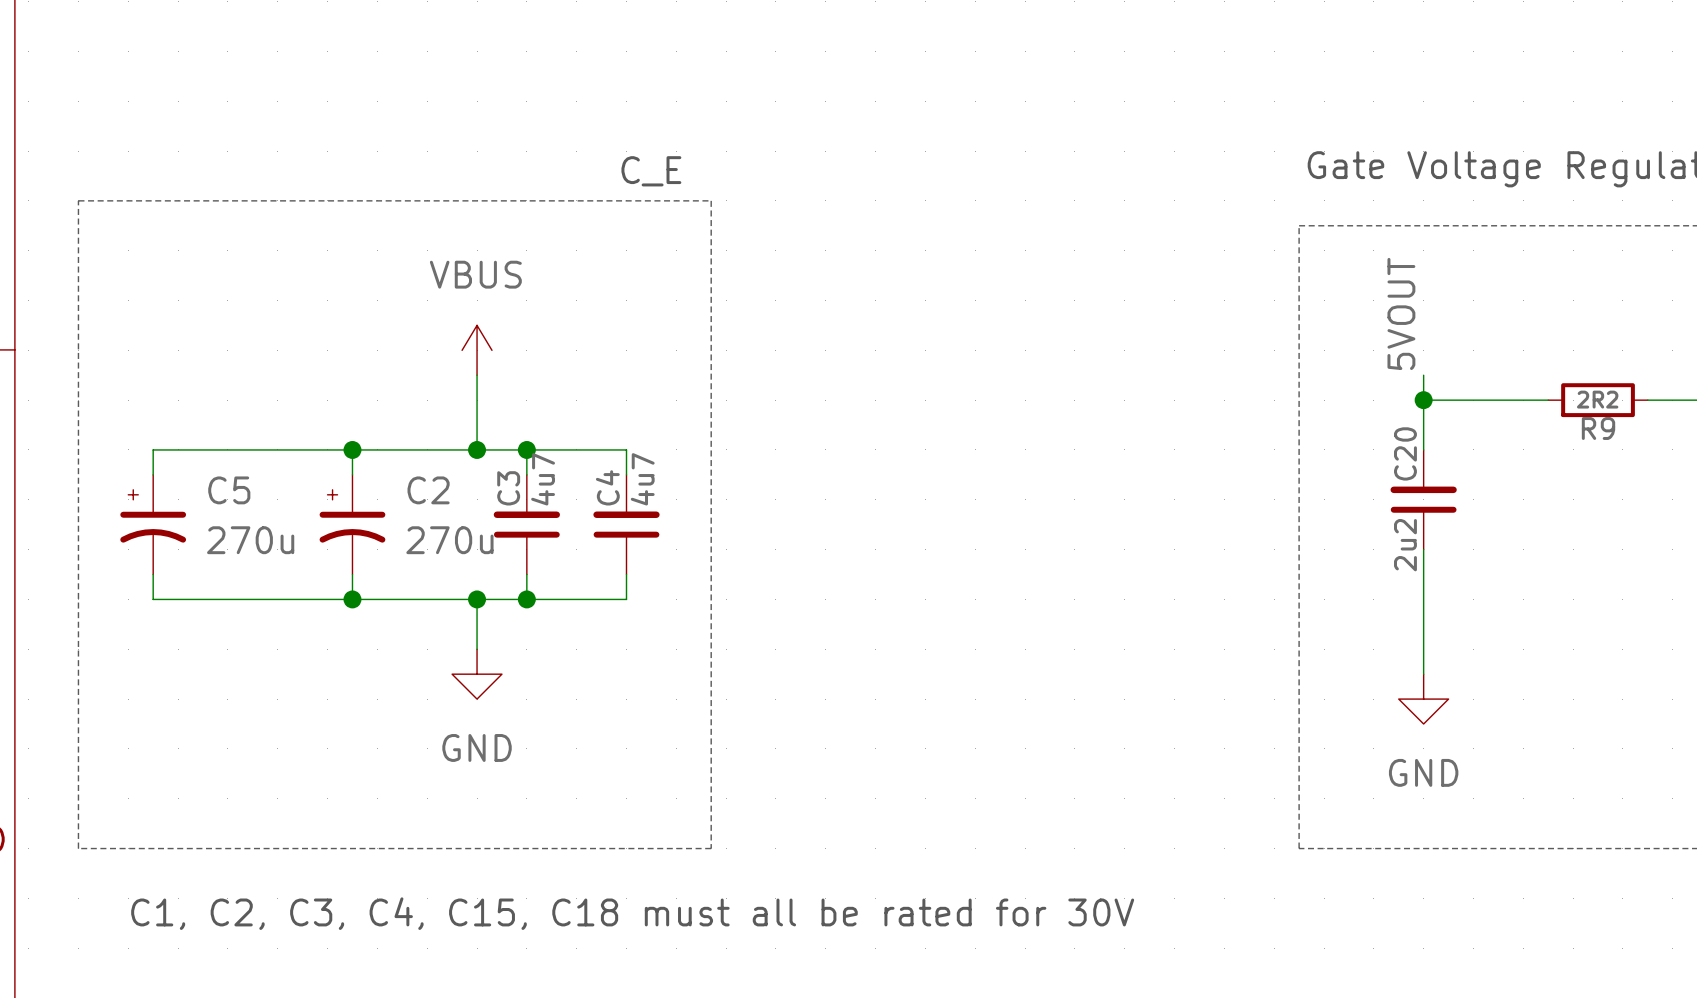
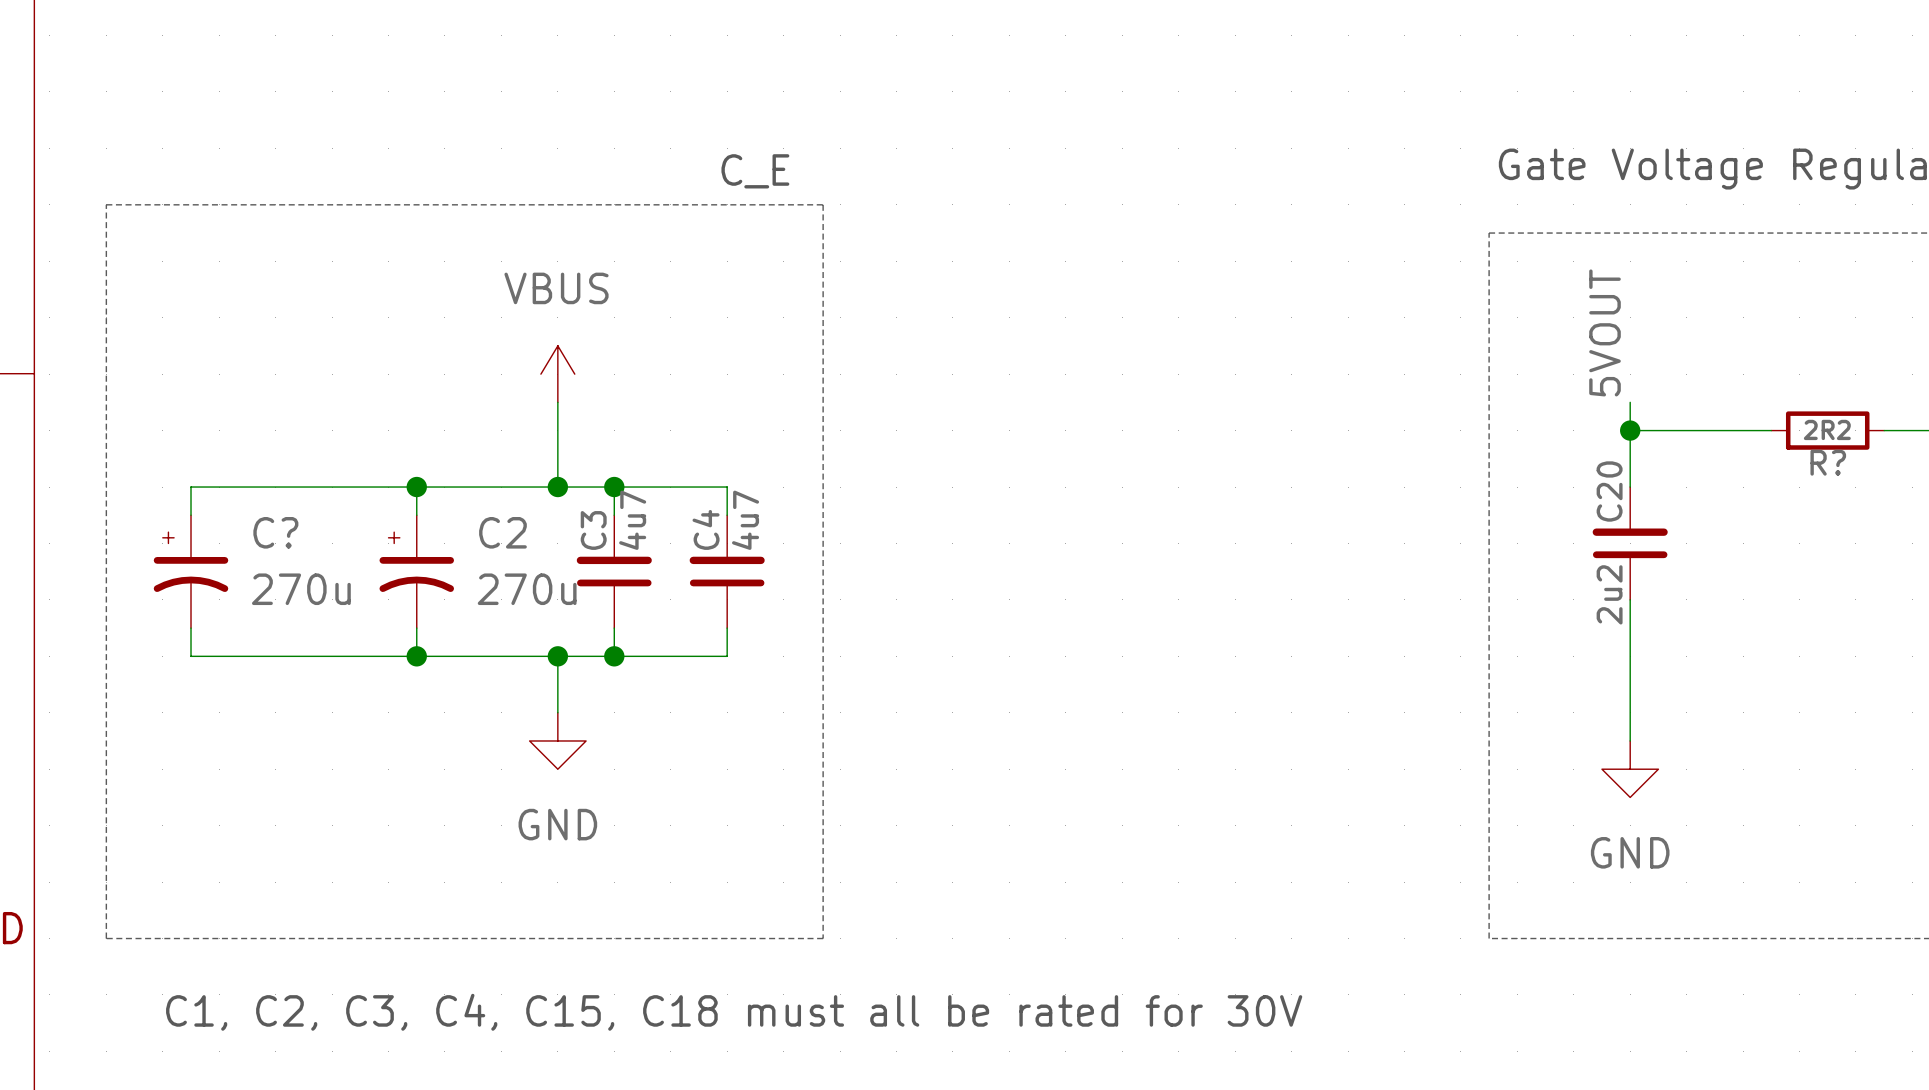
R9 name: R9 (1598, 428) -> R? (1828, 462)
C5 name: C5 (229, 490) -> C? (275, 532)

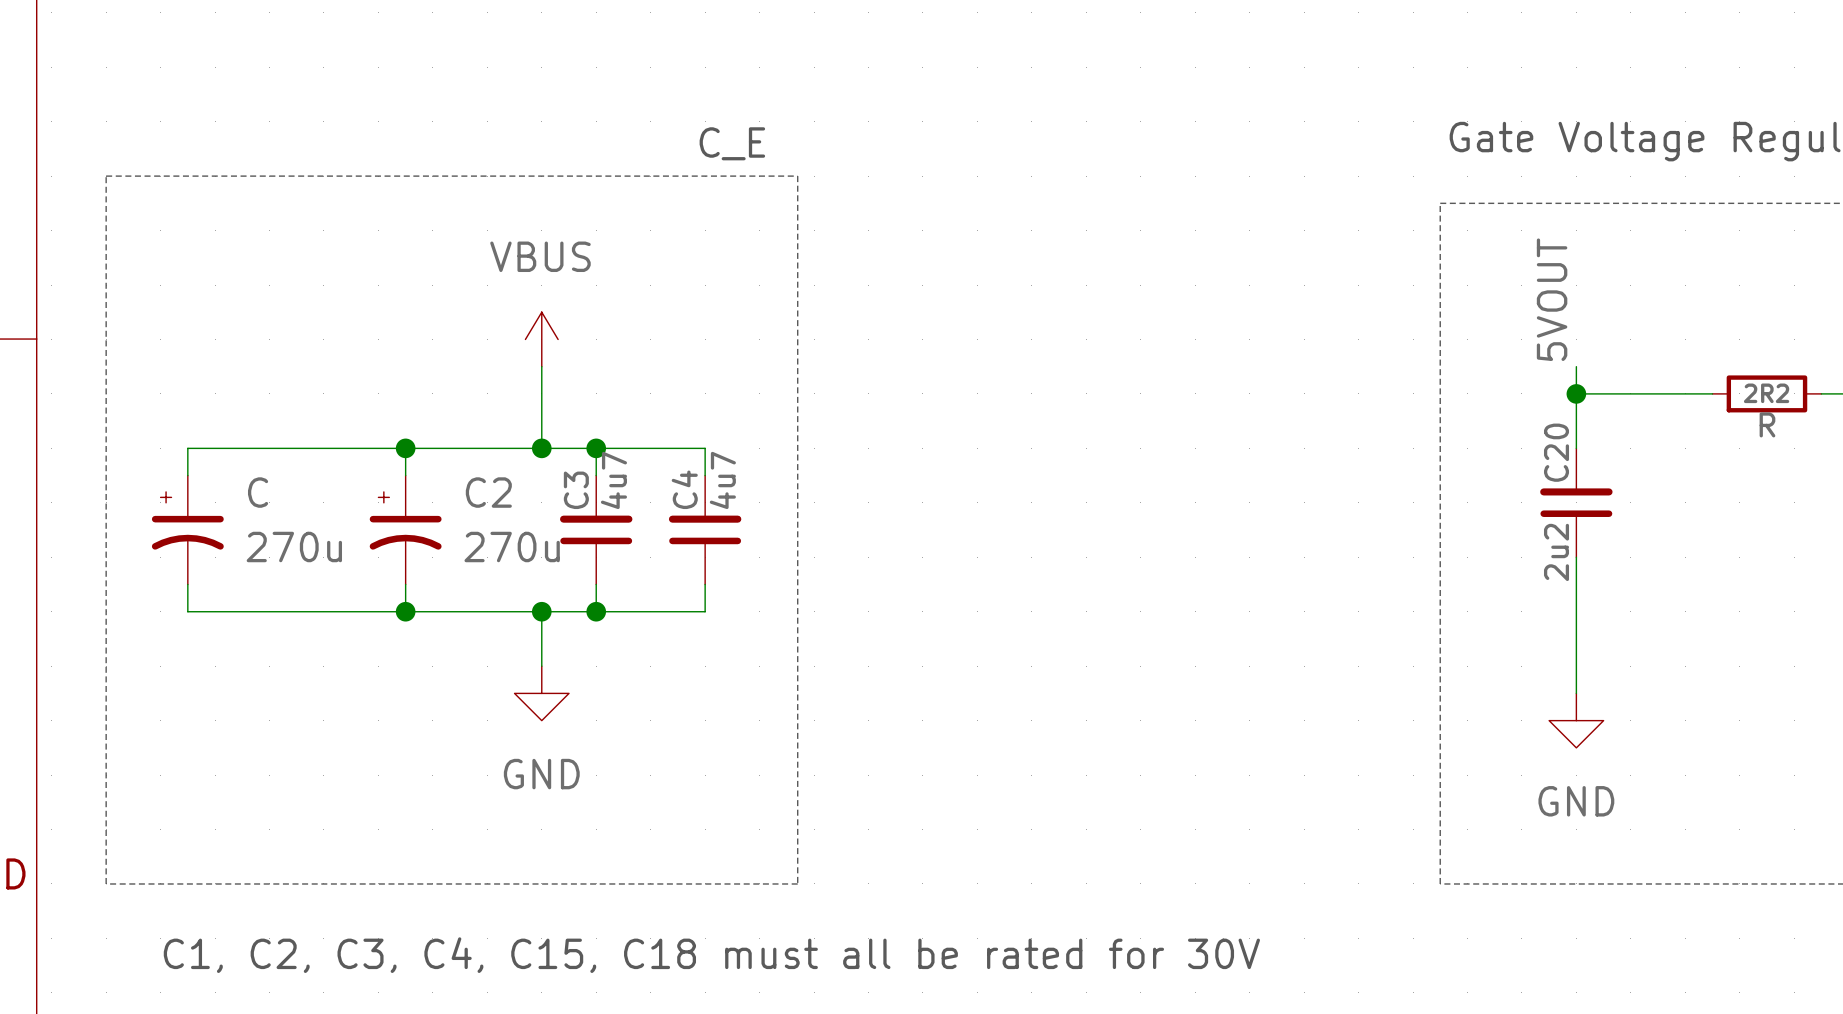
R? name: R? (1828, 462) -> R (1767, 424)
C? name: C? (275, 532) -> C (258, 492)

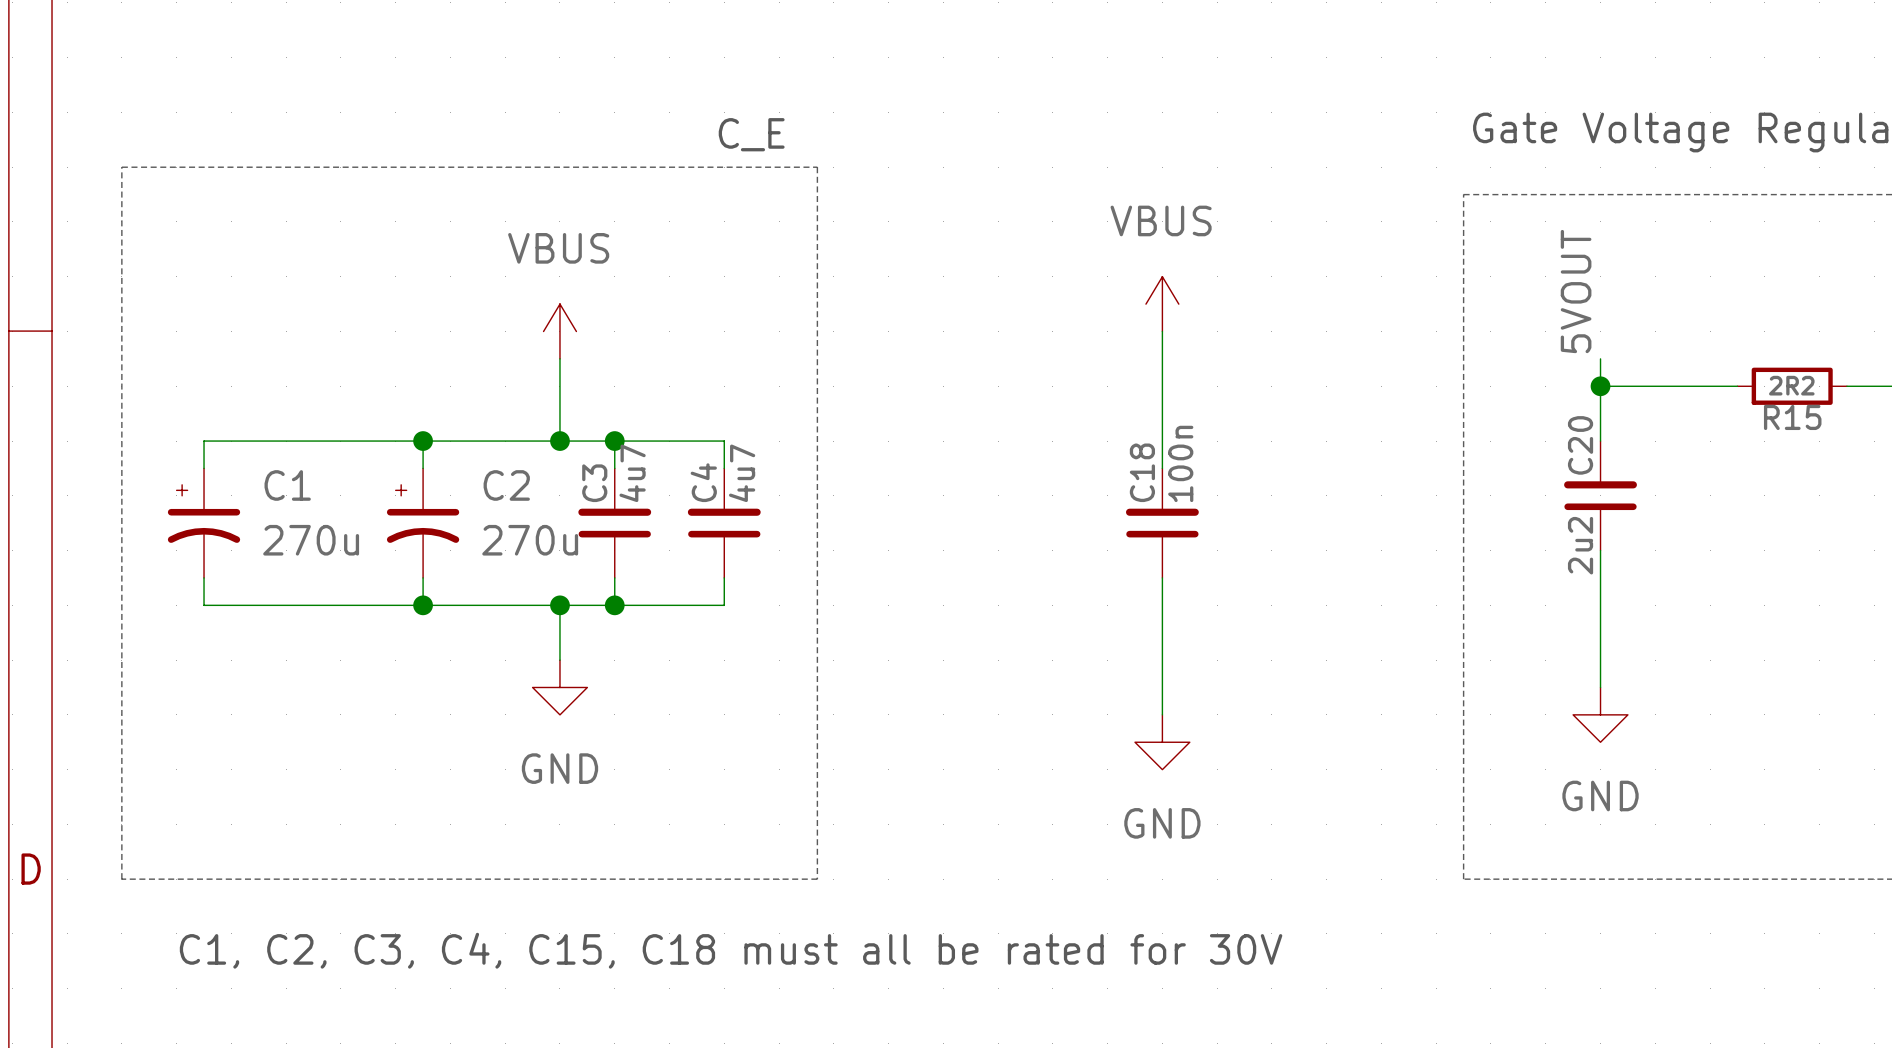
power symbol: none -> VBUS (1162, 304)
wire: none -> (1162, 331) (1162, 468)
R name: R (1767, 424) -> R15 (1792, 417)
C name: C (258, 492) -> C1 (287, 485)
C18: none -> 100n (1162, 523)
wire: none -> (1162, 577) (1162, 714)
power symbol: none -> GND (1162, 742)

